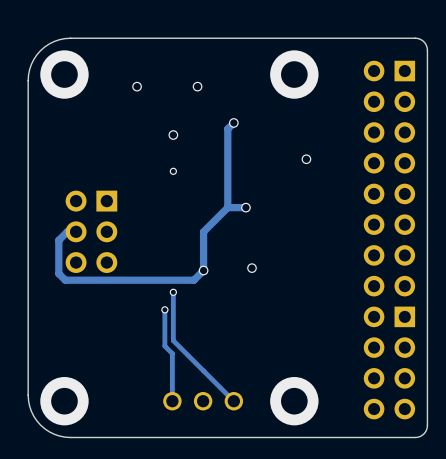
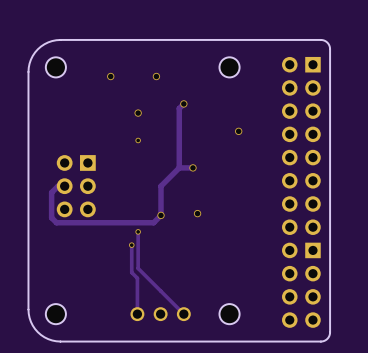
part: none -> (55, 67)
via: (64, 74) -> none
part: none -> (229, 67)
via: (294, 74) -> none
part: none -> (55, 314)
via: (64, 401) -> none
part: none -> (229, 314)
via: (294, 401) -> none

